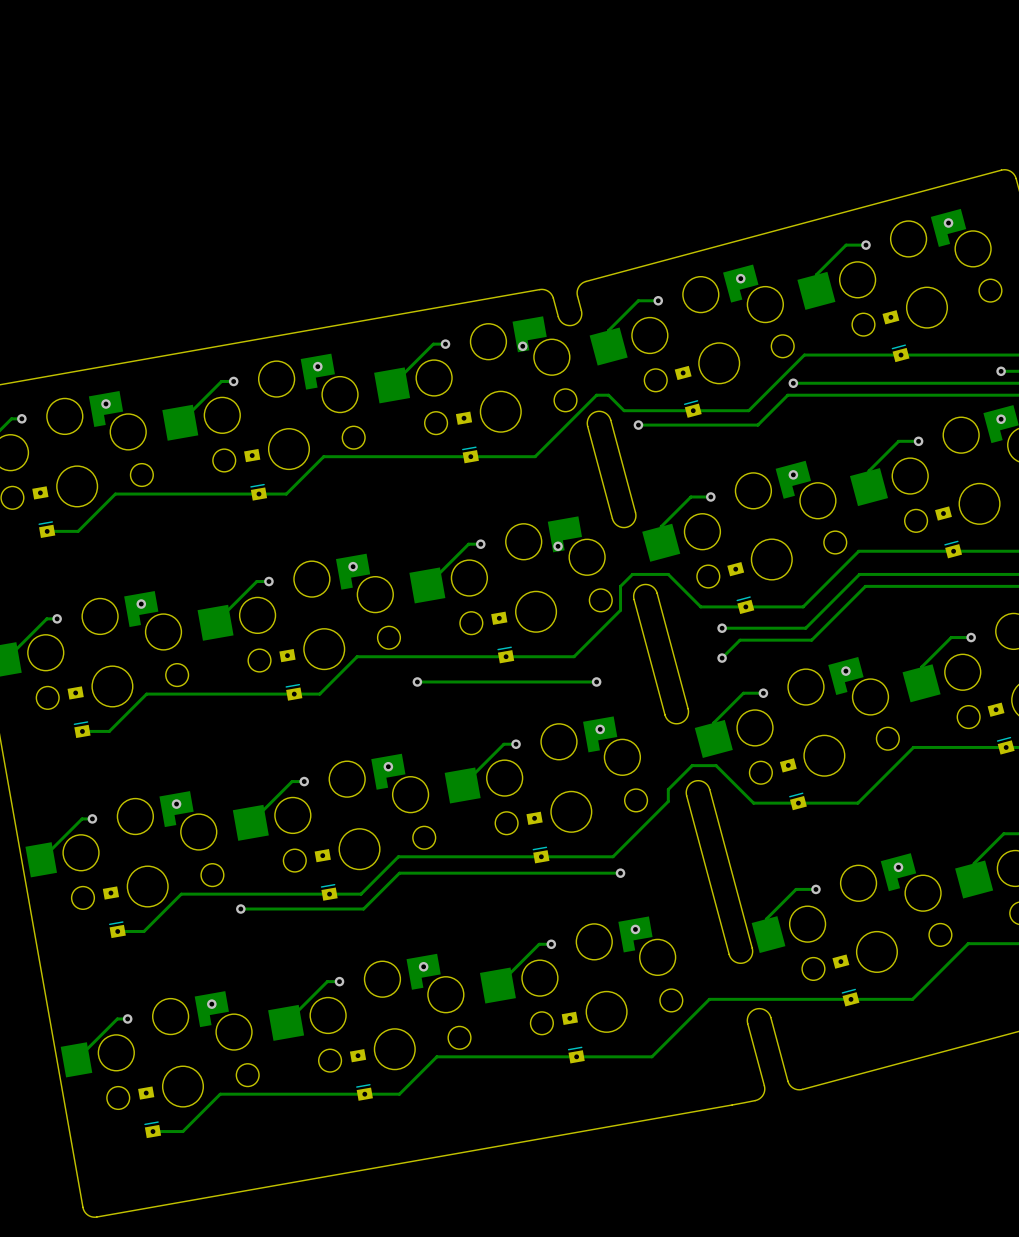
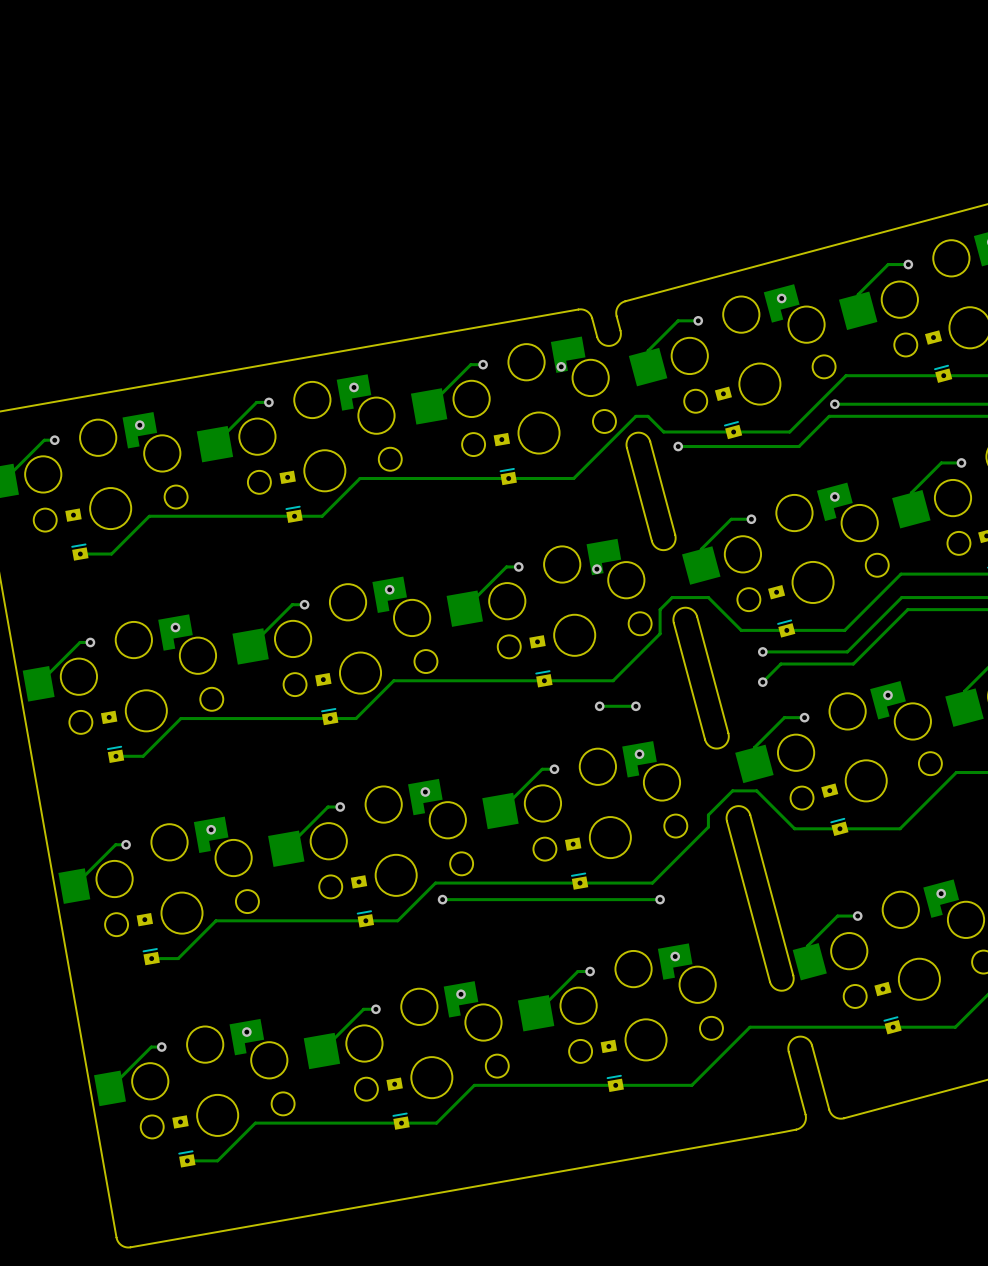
via: (417, 681) -> none
track: (560, 681) (417, 681) -> none
via: none -> (599, 706)
track: (405, 873) (399, 873) (363, 909) (240, 909) -> none
via: none -> (442, 899)
via: (240, 909) -> none

